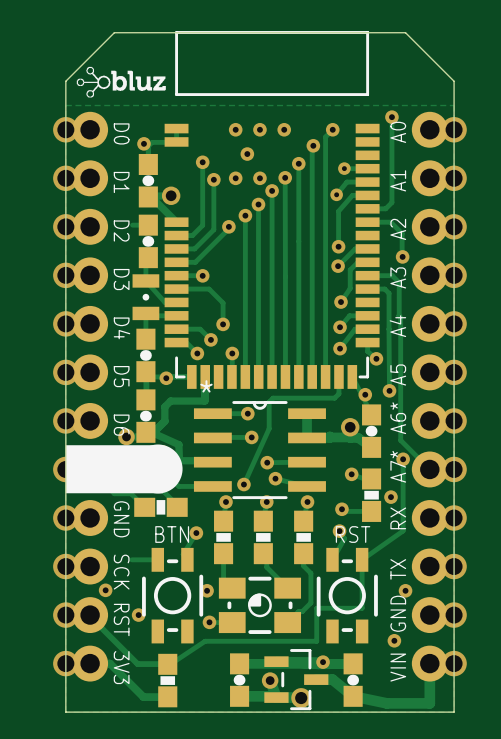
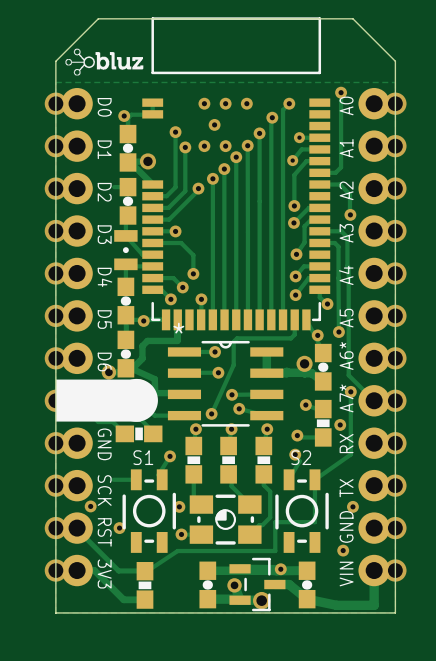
BTN name: BTN (172, 534) -> S1 (143, 457)
RST name: RST (353, 534) -> S2 (301, 457)

